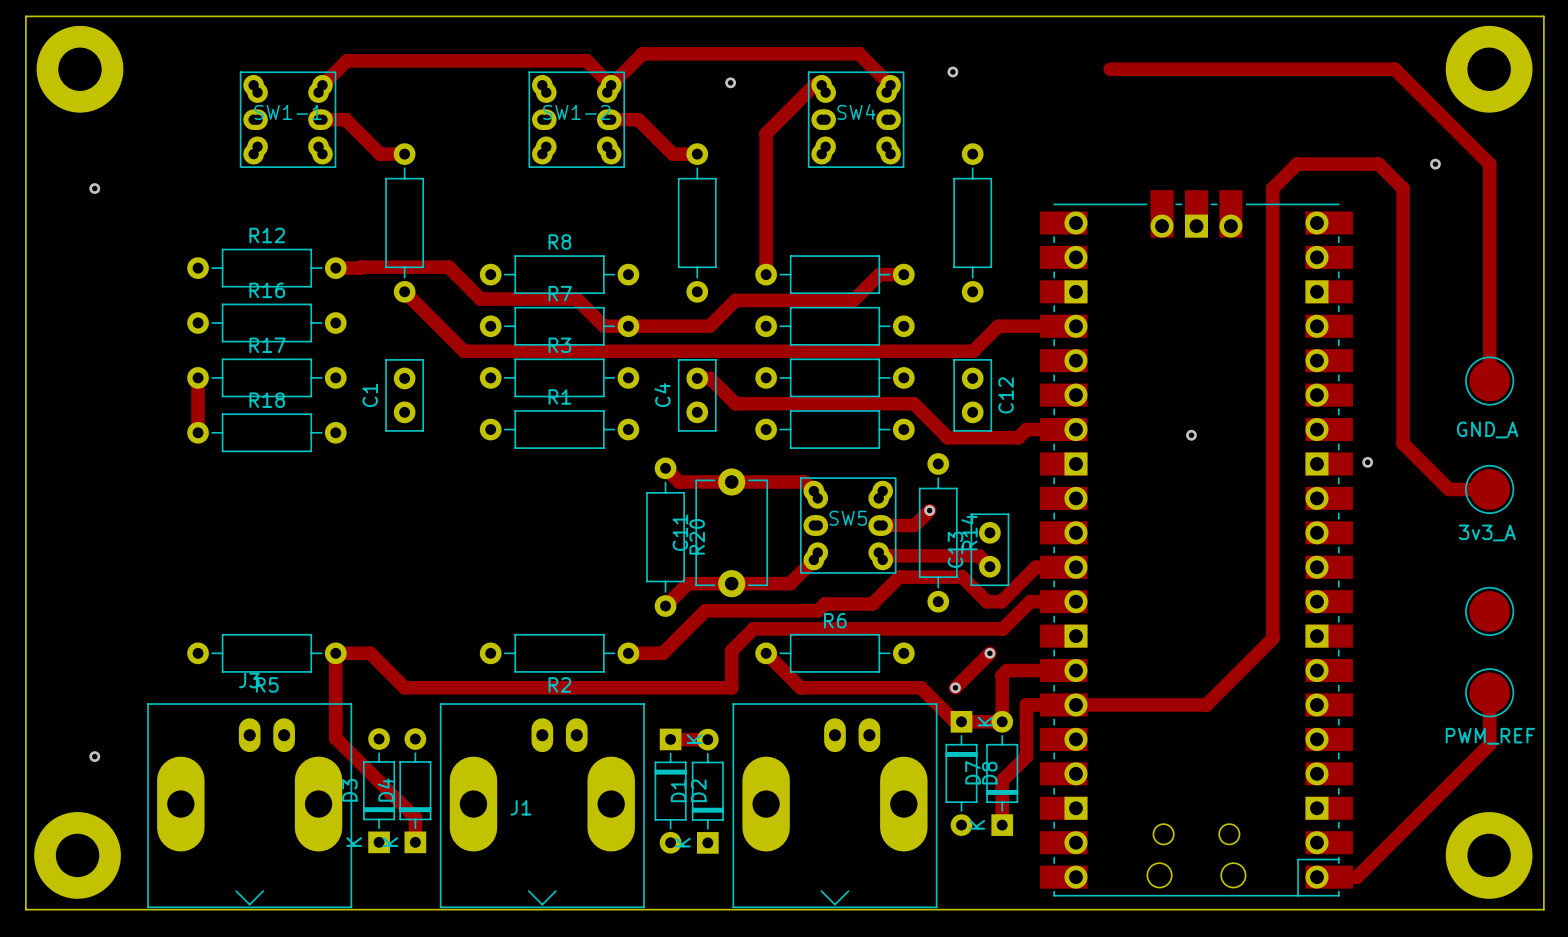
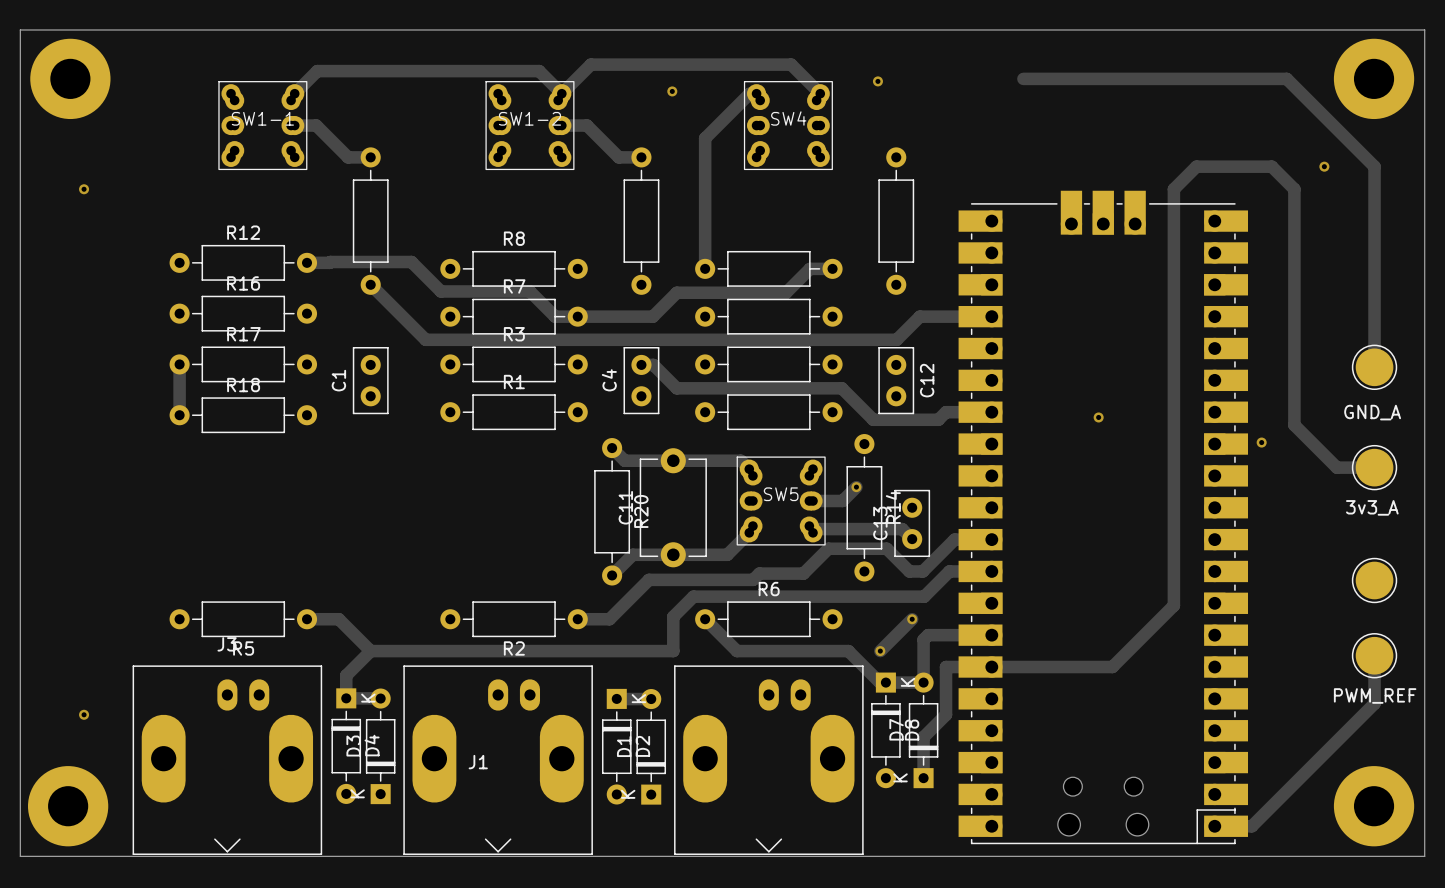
track: (335, 653) (335, 738) (415, 817) (415, 842) -> none
track: none -> (370, 651) (346, 675) (346, 698) (381, 698)
D4: none -> (346, 746)
D3: (379, 790) -> none
D4 name: D4 (385, 790) -> D3 (353, 746)

